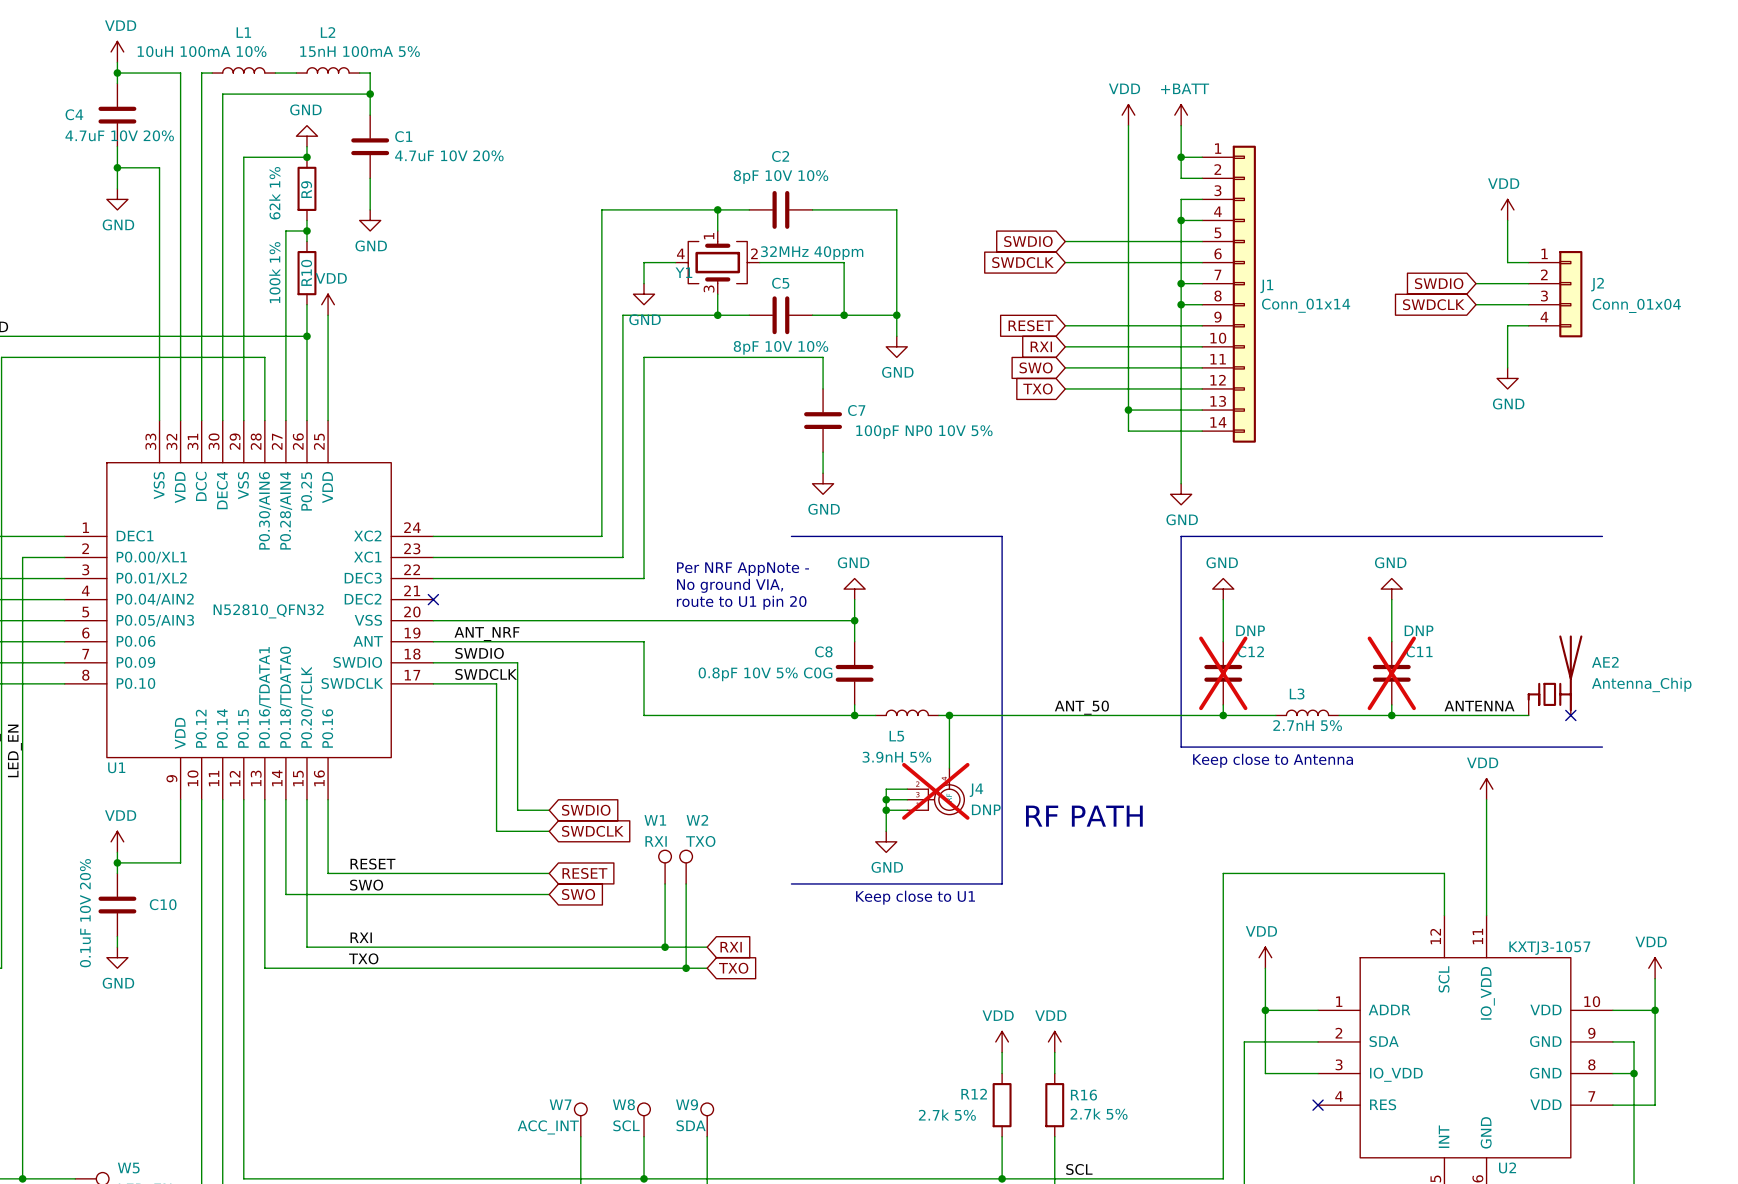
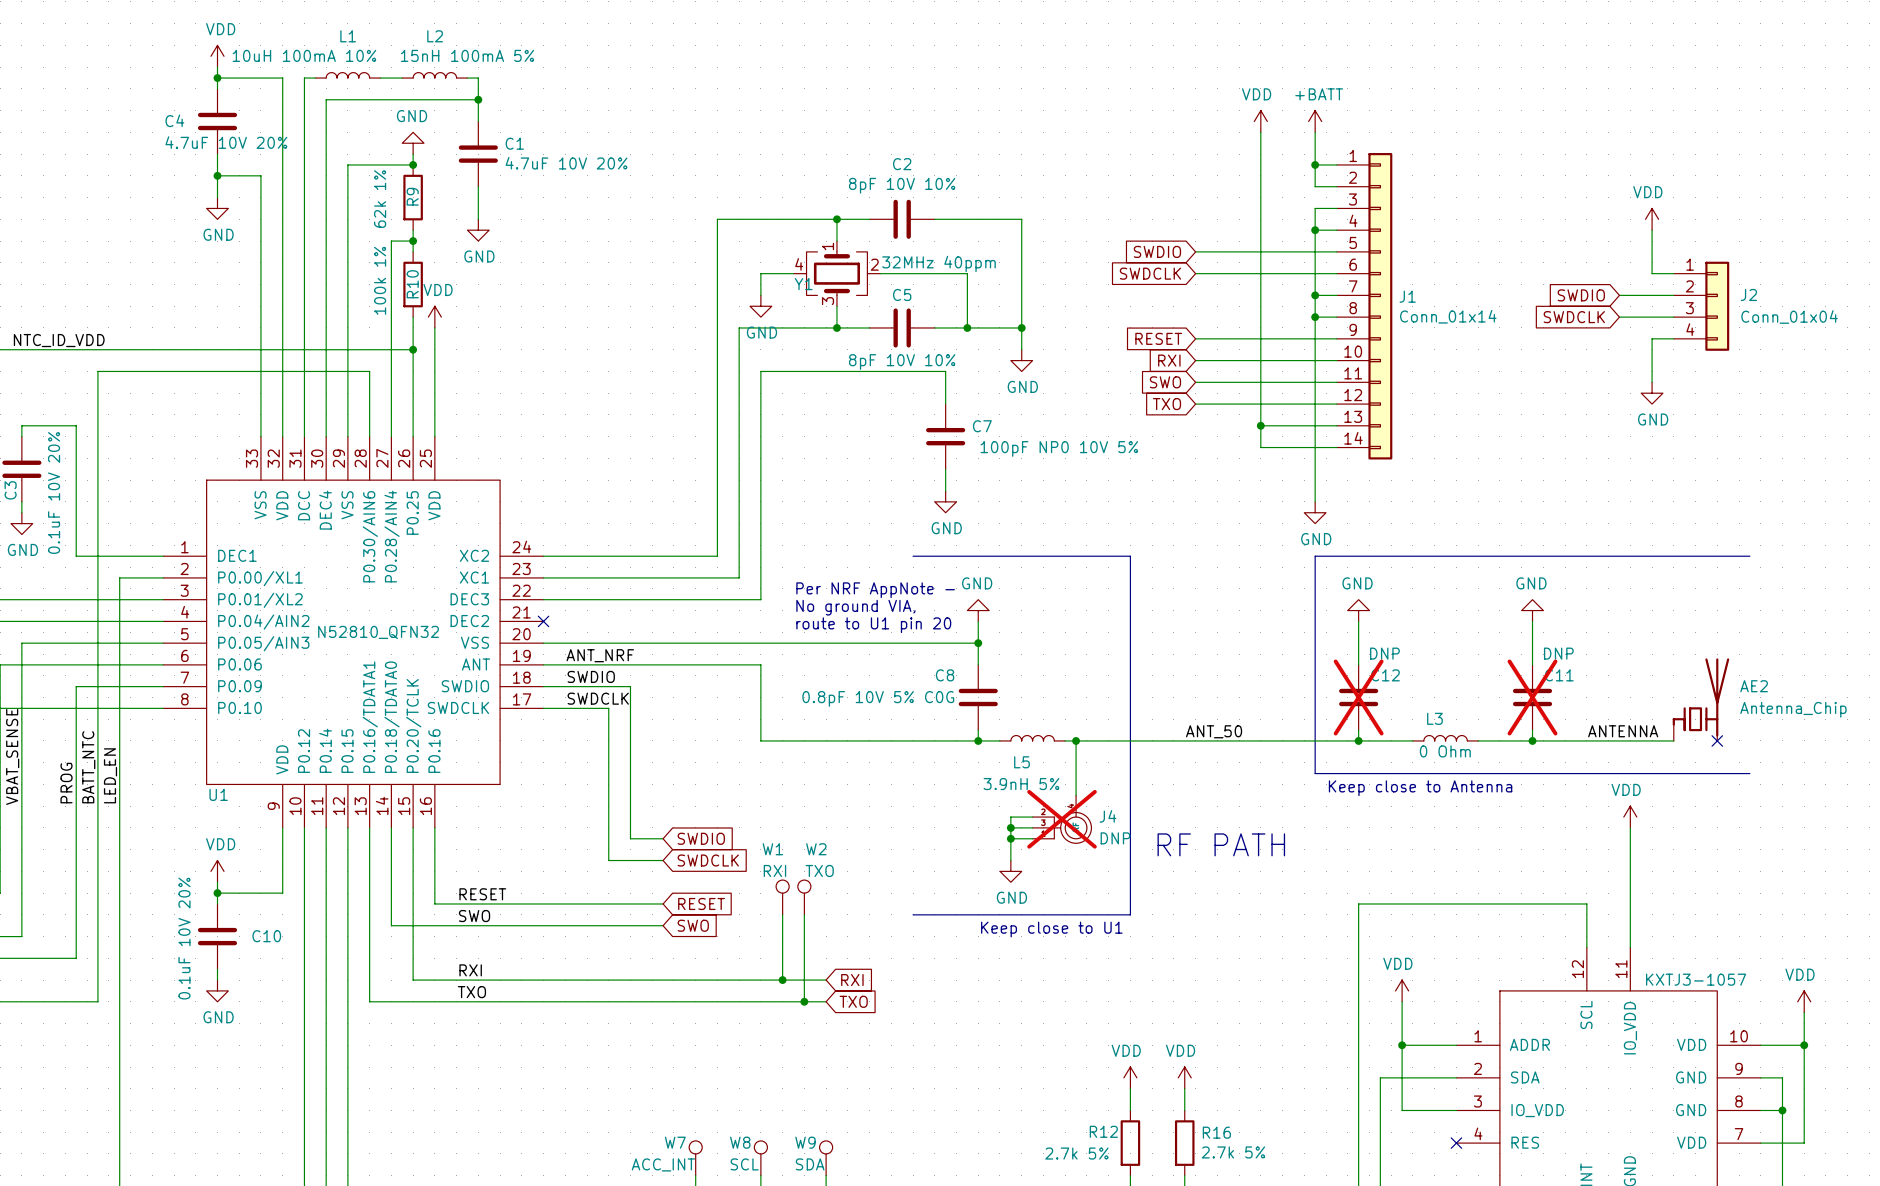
L3 value: 2.7nH 5% (1307, 725) -> 0 Ohm (1445, 751)

